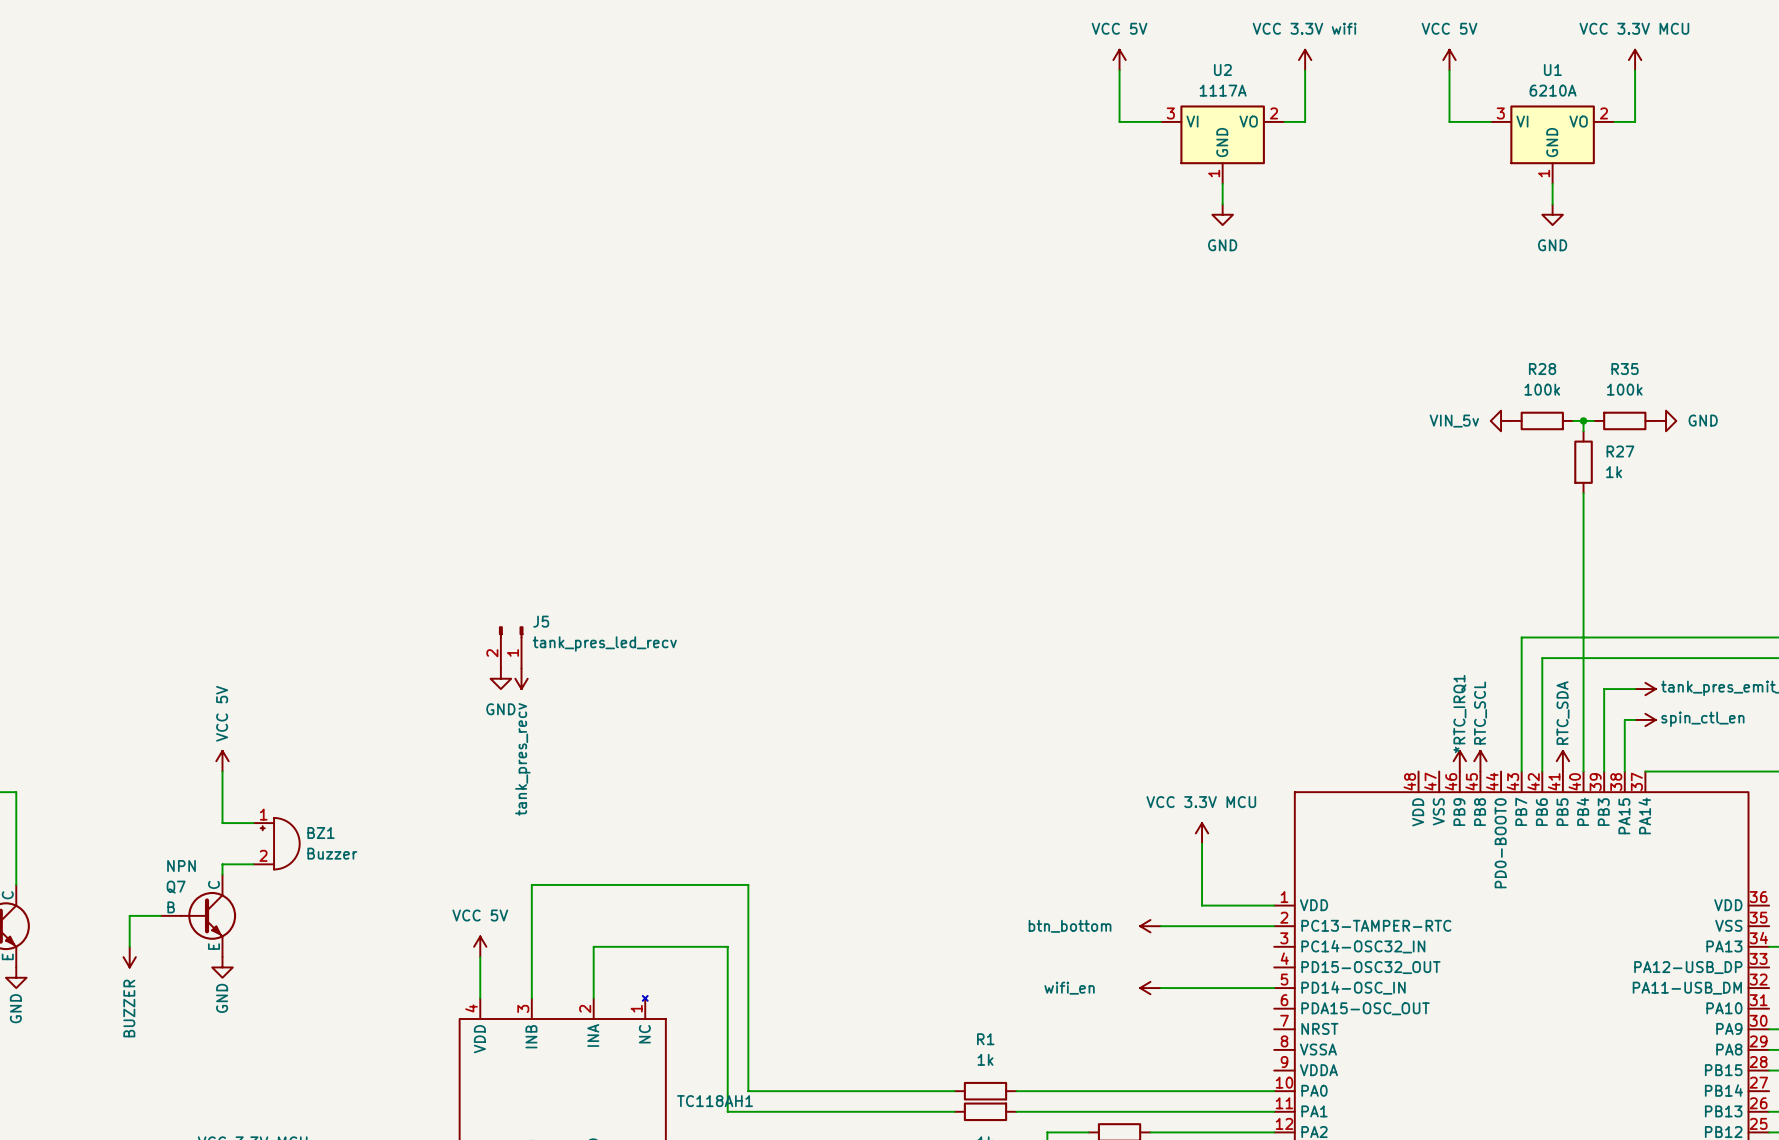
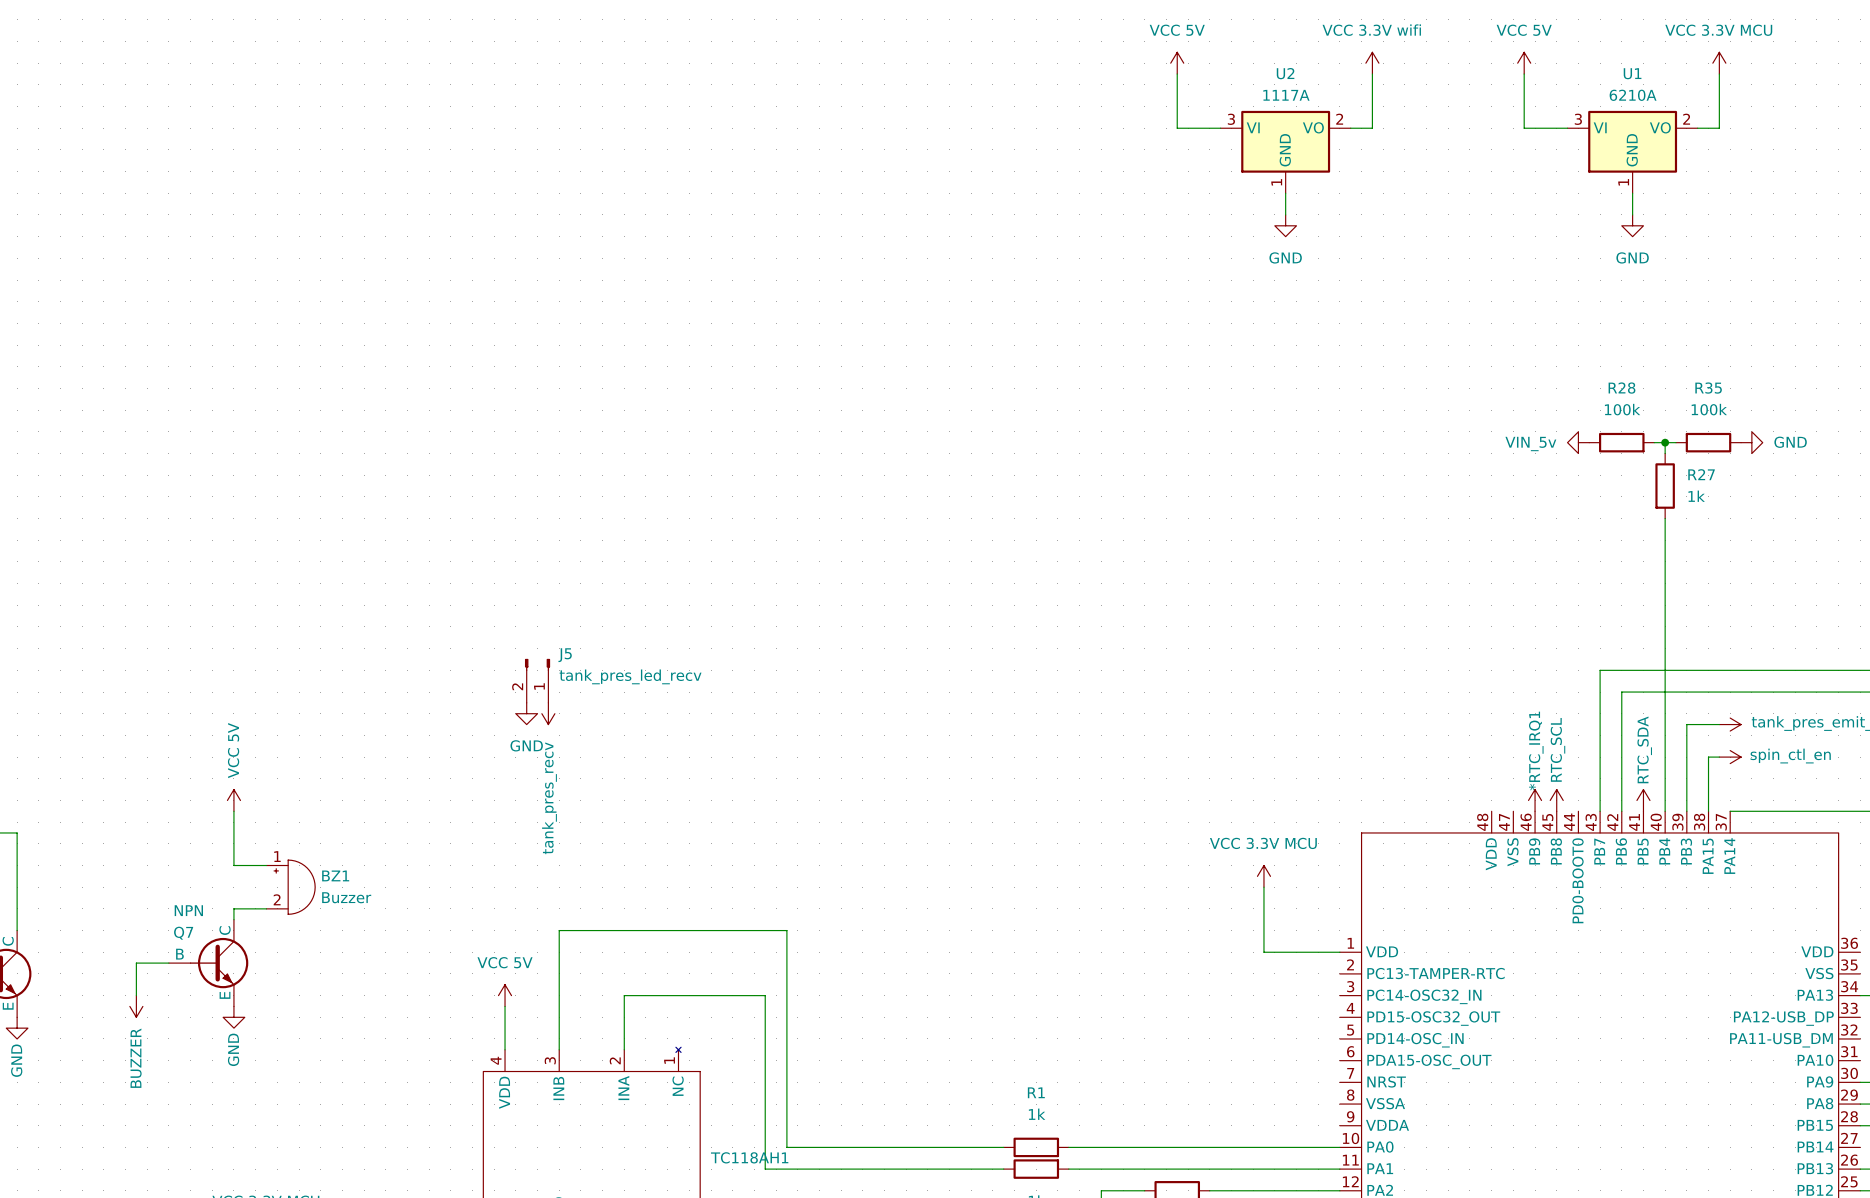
power symbol: btn_bottom (1150, 926) -> none
wire: (1160, 926) (1274, 926) -> none
power symbol: wifi_en (1150, 988) -> none
wire: (1160, 988) (1274, 988) -> none

